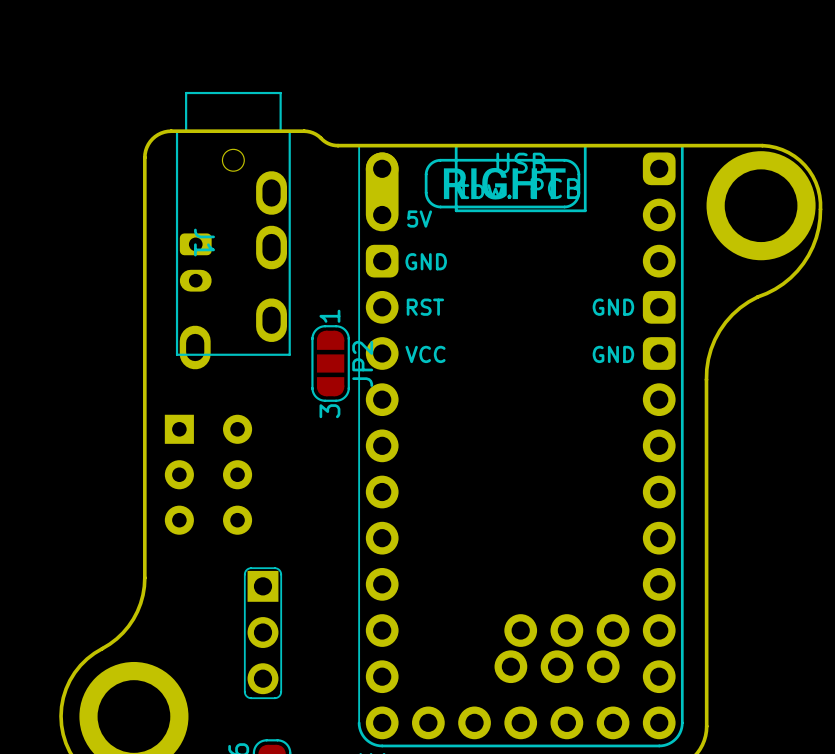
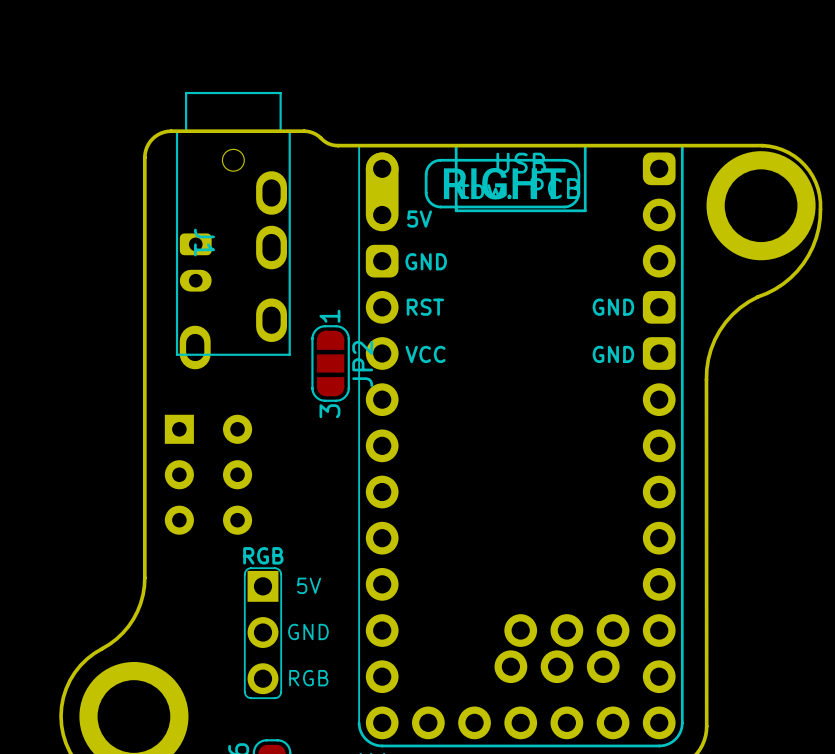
part text: none -> RGB (263, 555)
part text: none -> 5V (309, 585)
part text: none -> GND (308, 631)
part text: none -> RGB (308, 678)

